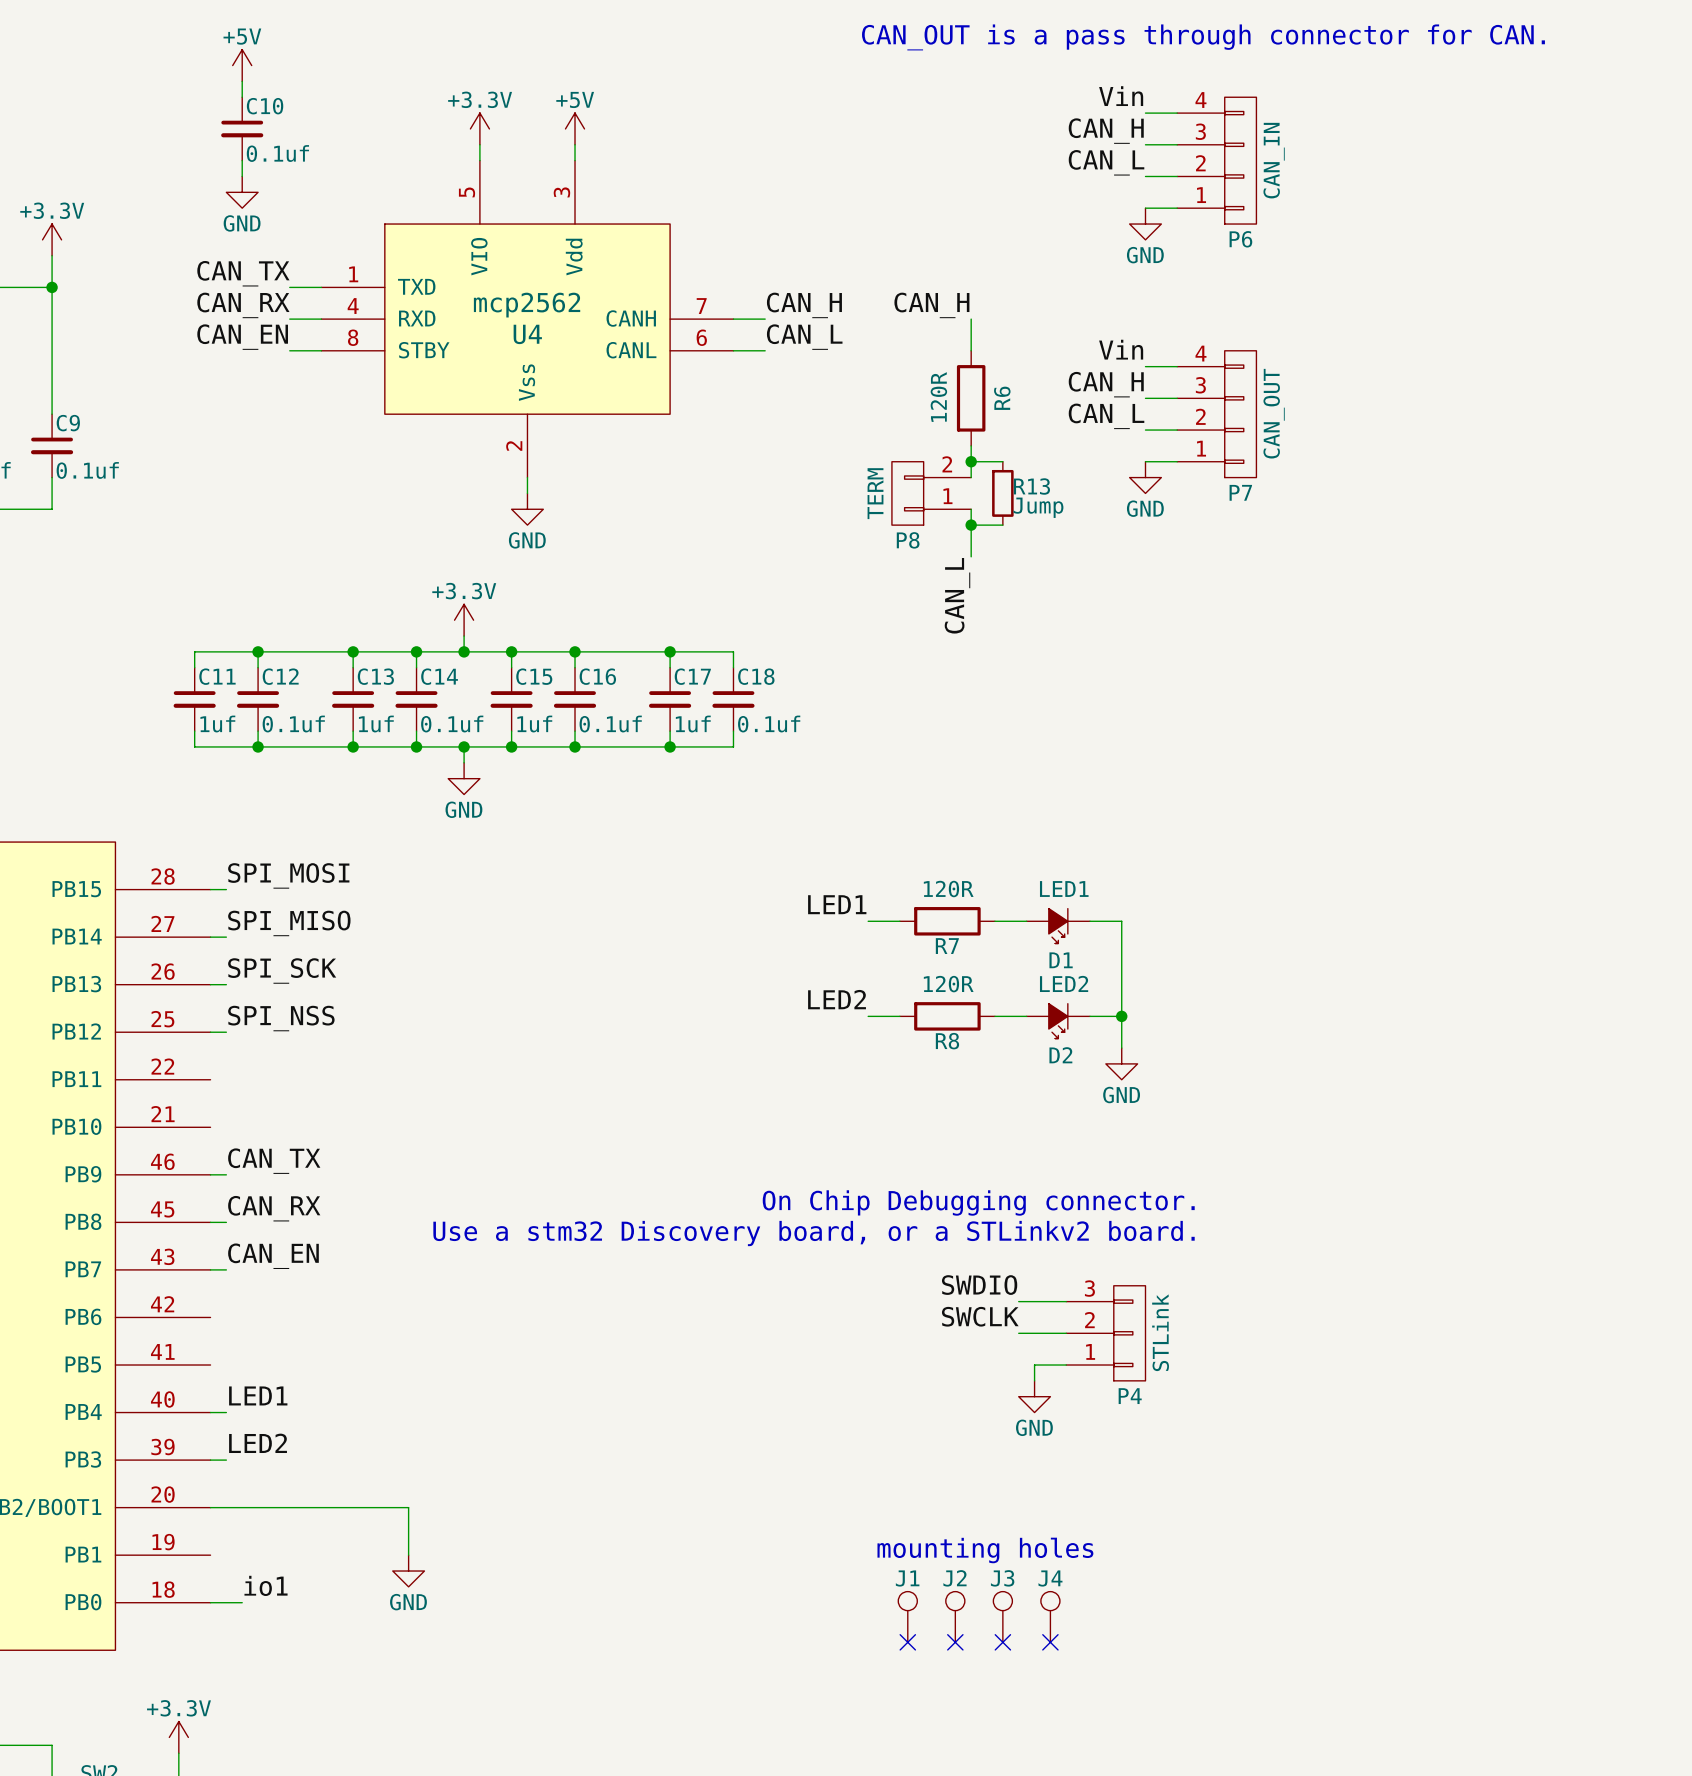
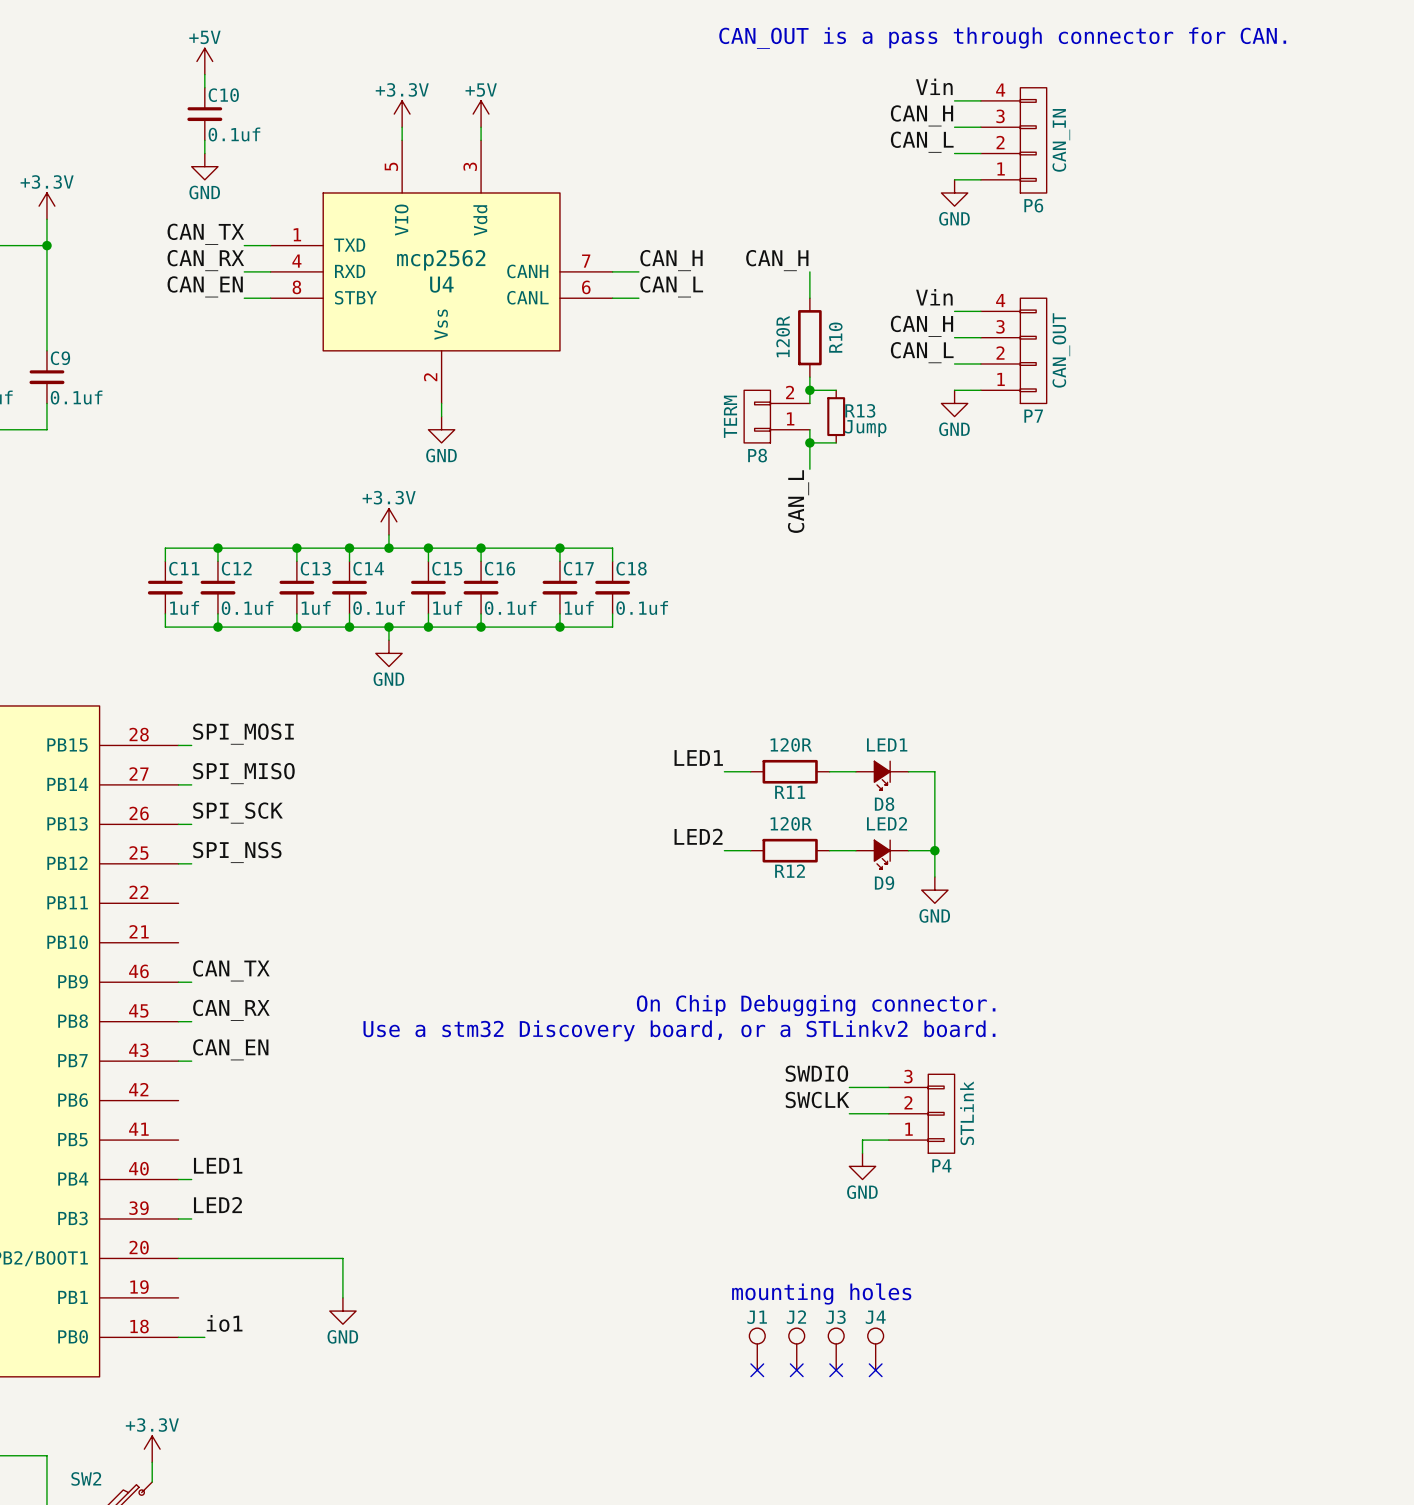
R6 name: R6 (1002, 398) -> R10 (835, 337)
R7 name: R7 (947, 946) -> R11 (790, 792)
D1 name: D1 (1061, 960) -> D8 (884, 804)
R8 name: R8 (947, 1041) -> R12 (790, 871)
D2 name: D2 (1060, 1055) -> D9 (884, 883)

